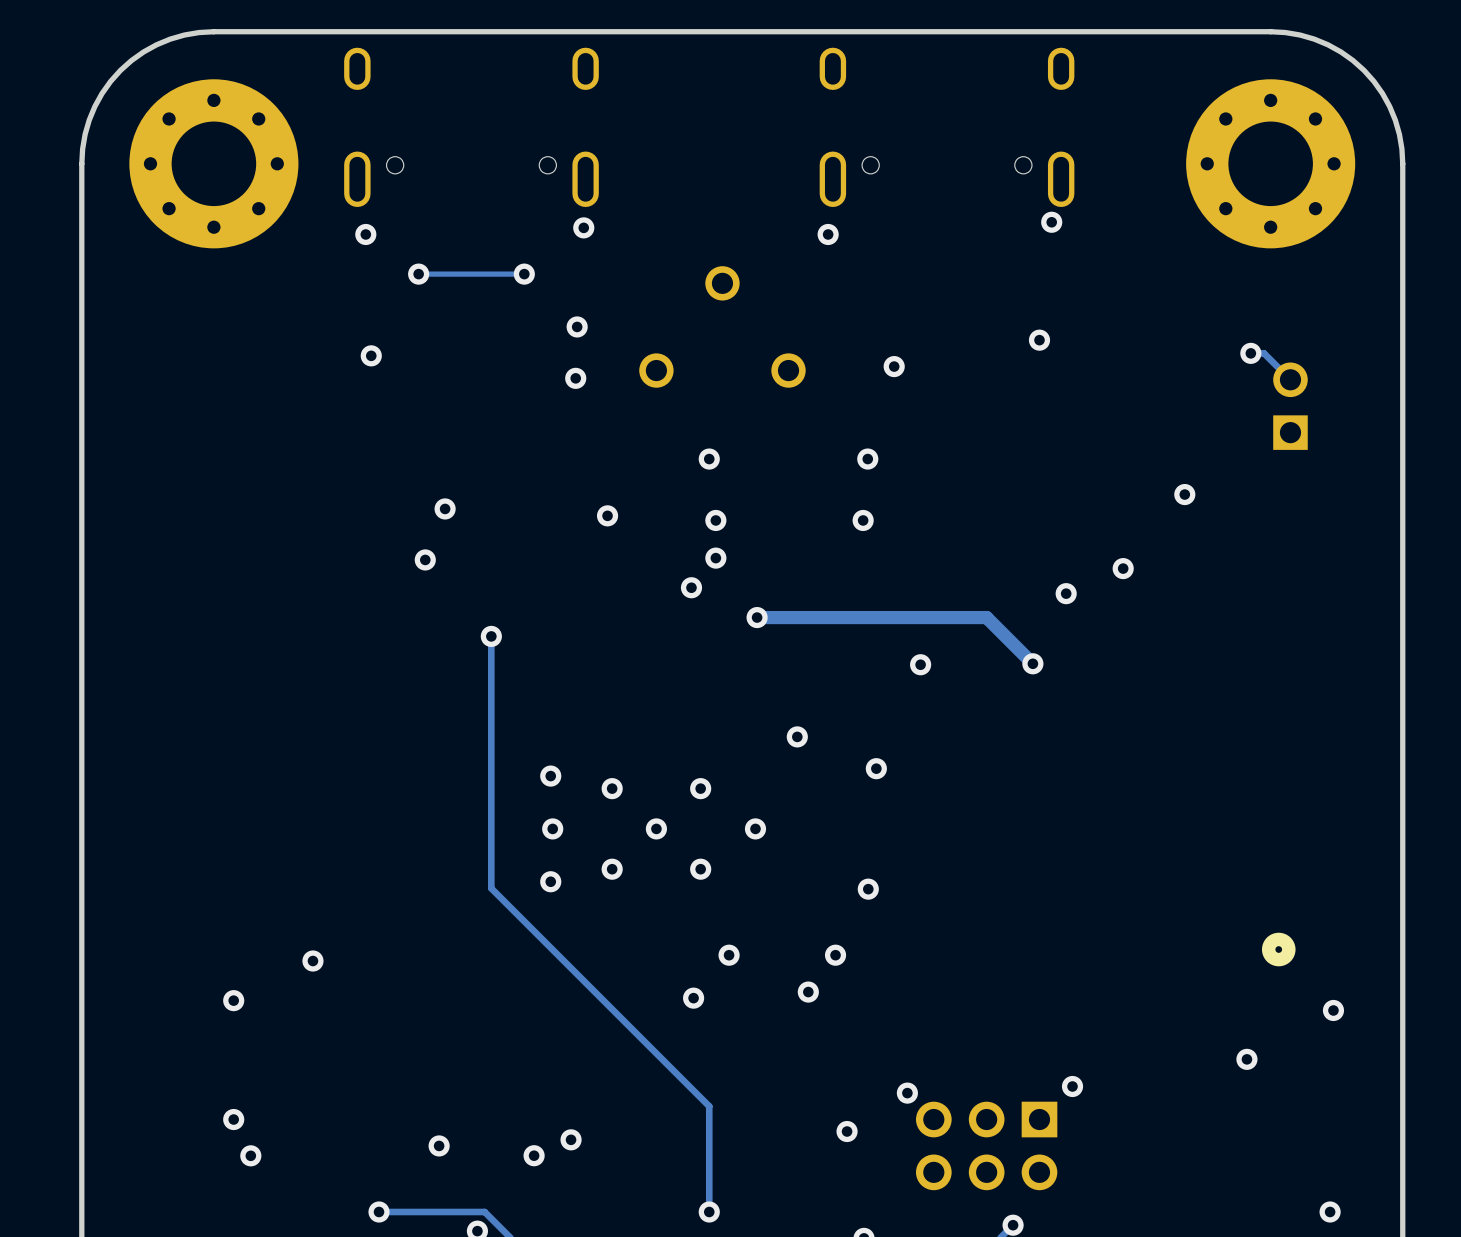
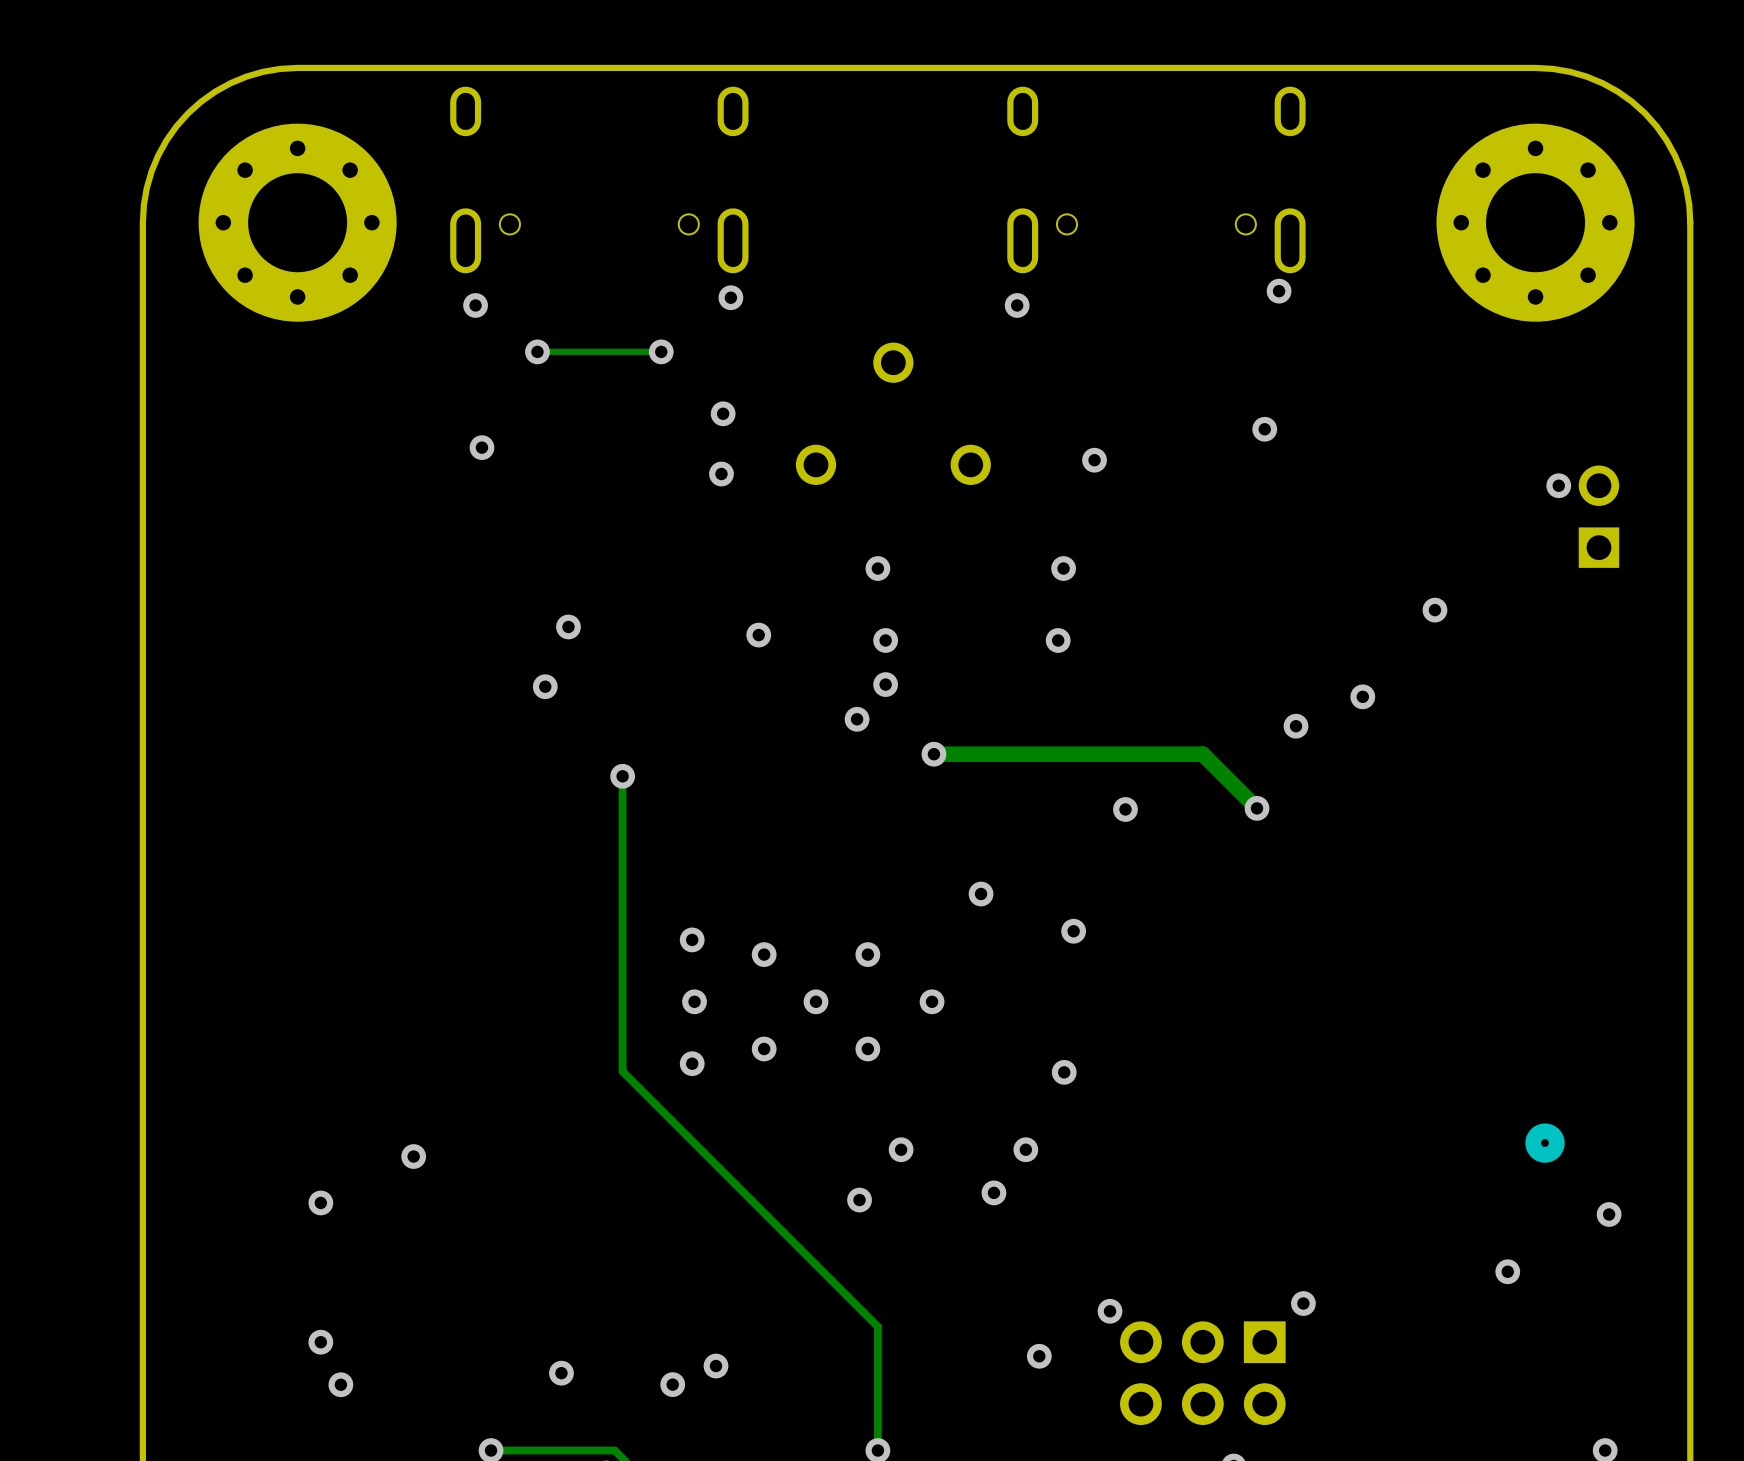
track: (1250, 353) (1264, 353) (1290, 379) -> none
via position: (1250, 353) -> (1558, 485)
part position: (1290, 406) -> (1598, 516)

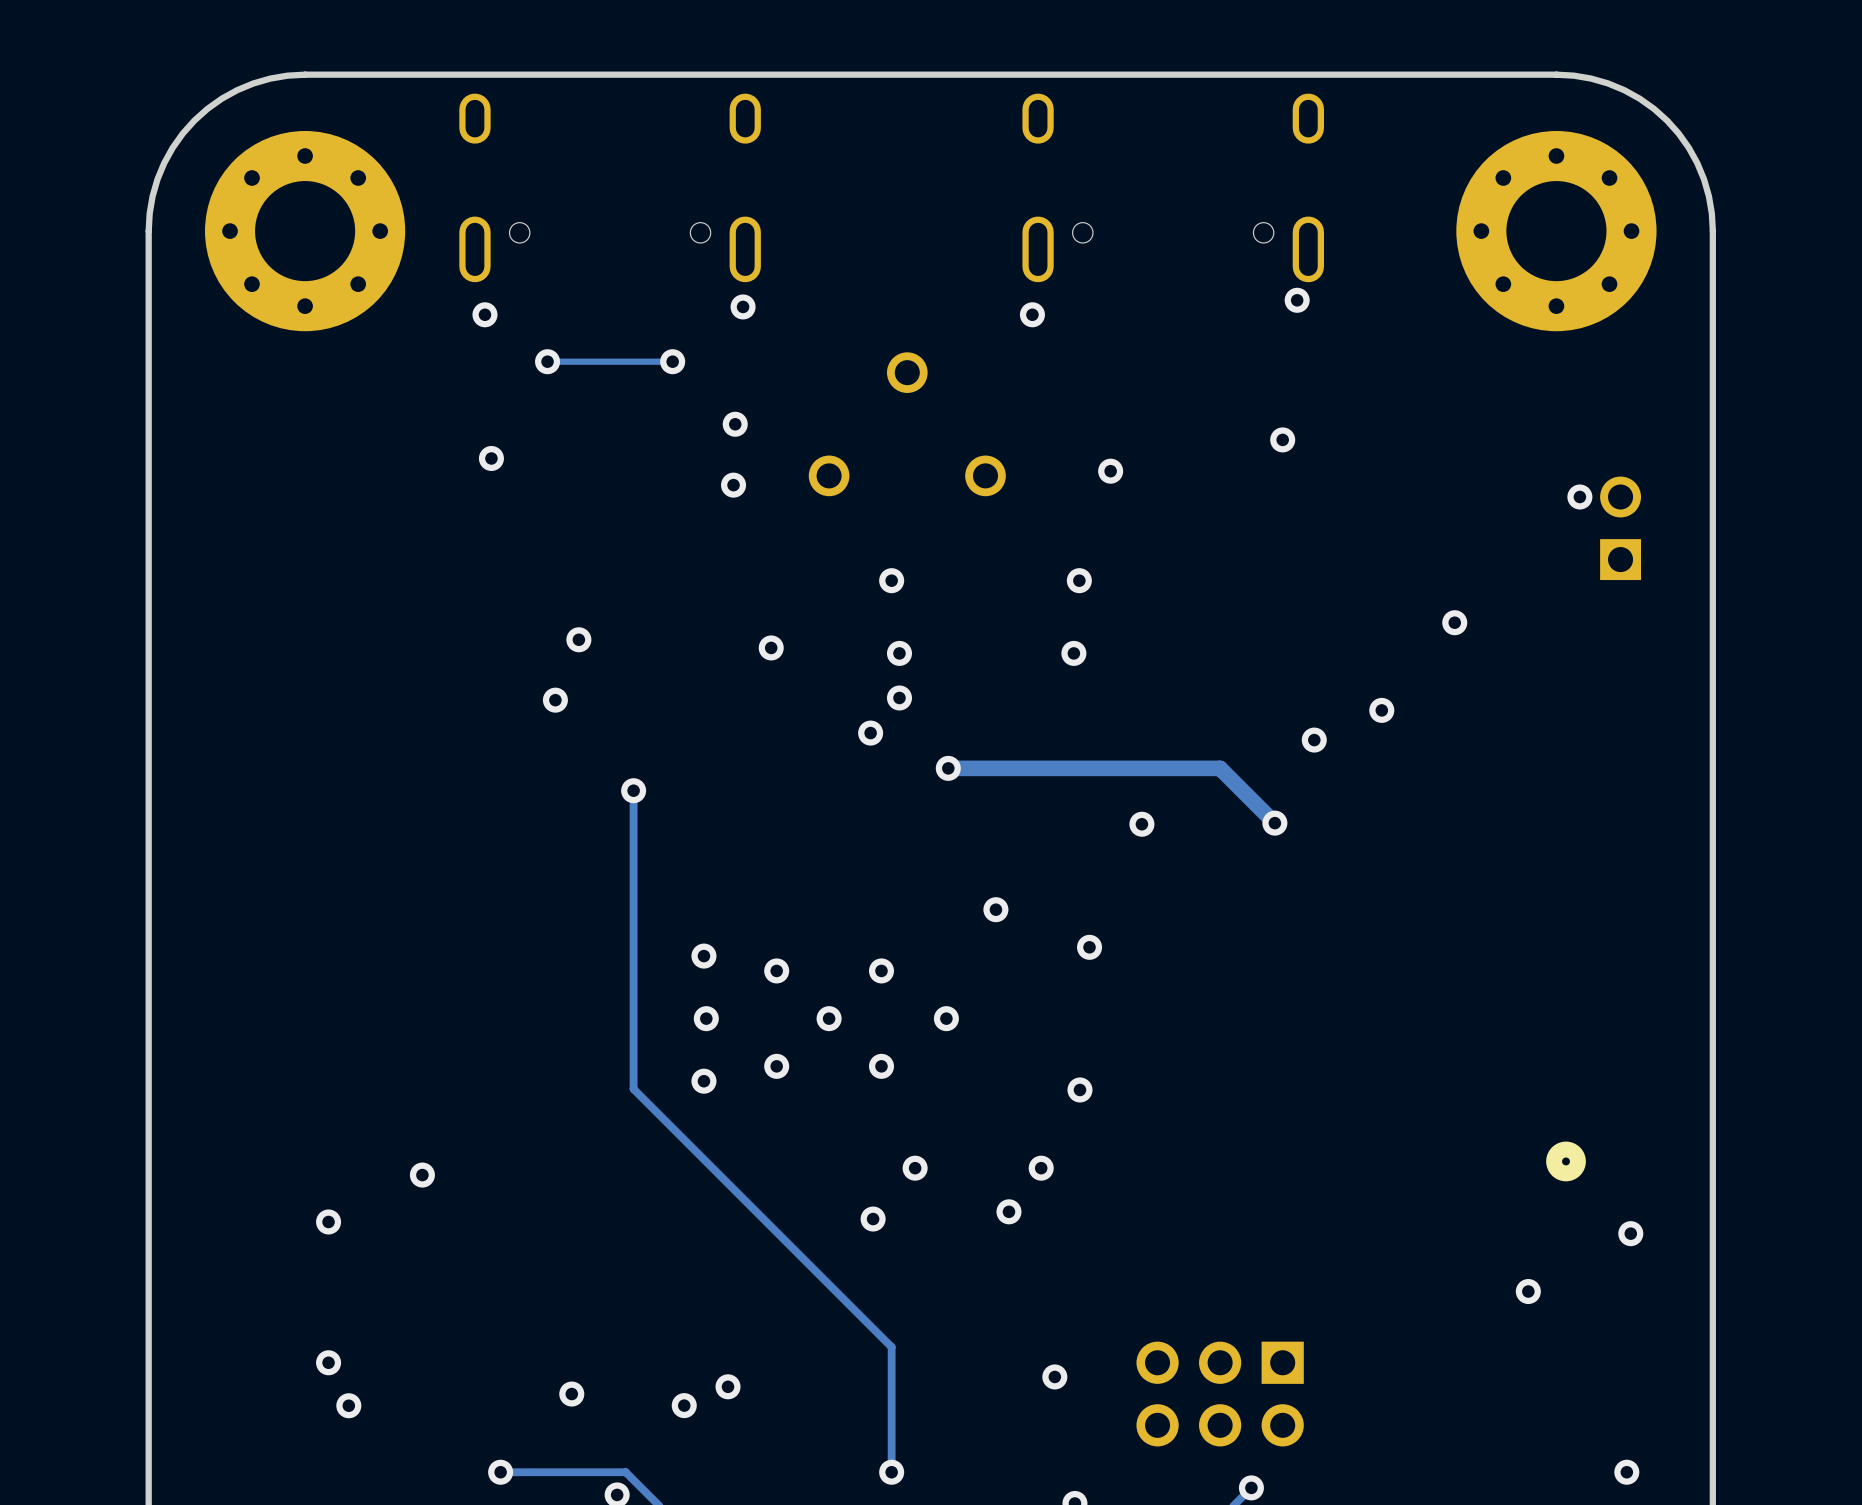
via: (1303, 1303) -> none
via: (1110, 1311) -> none

